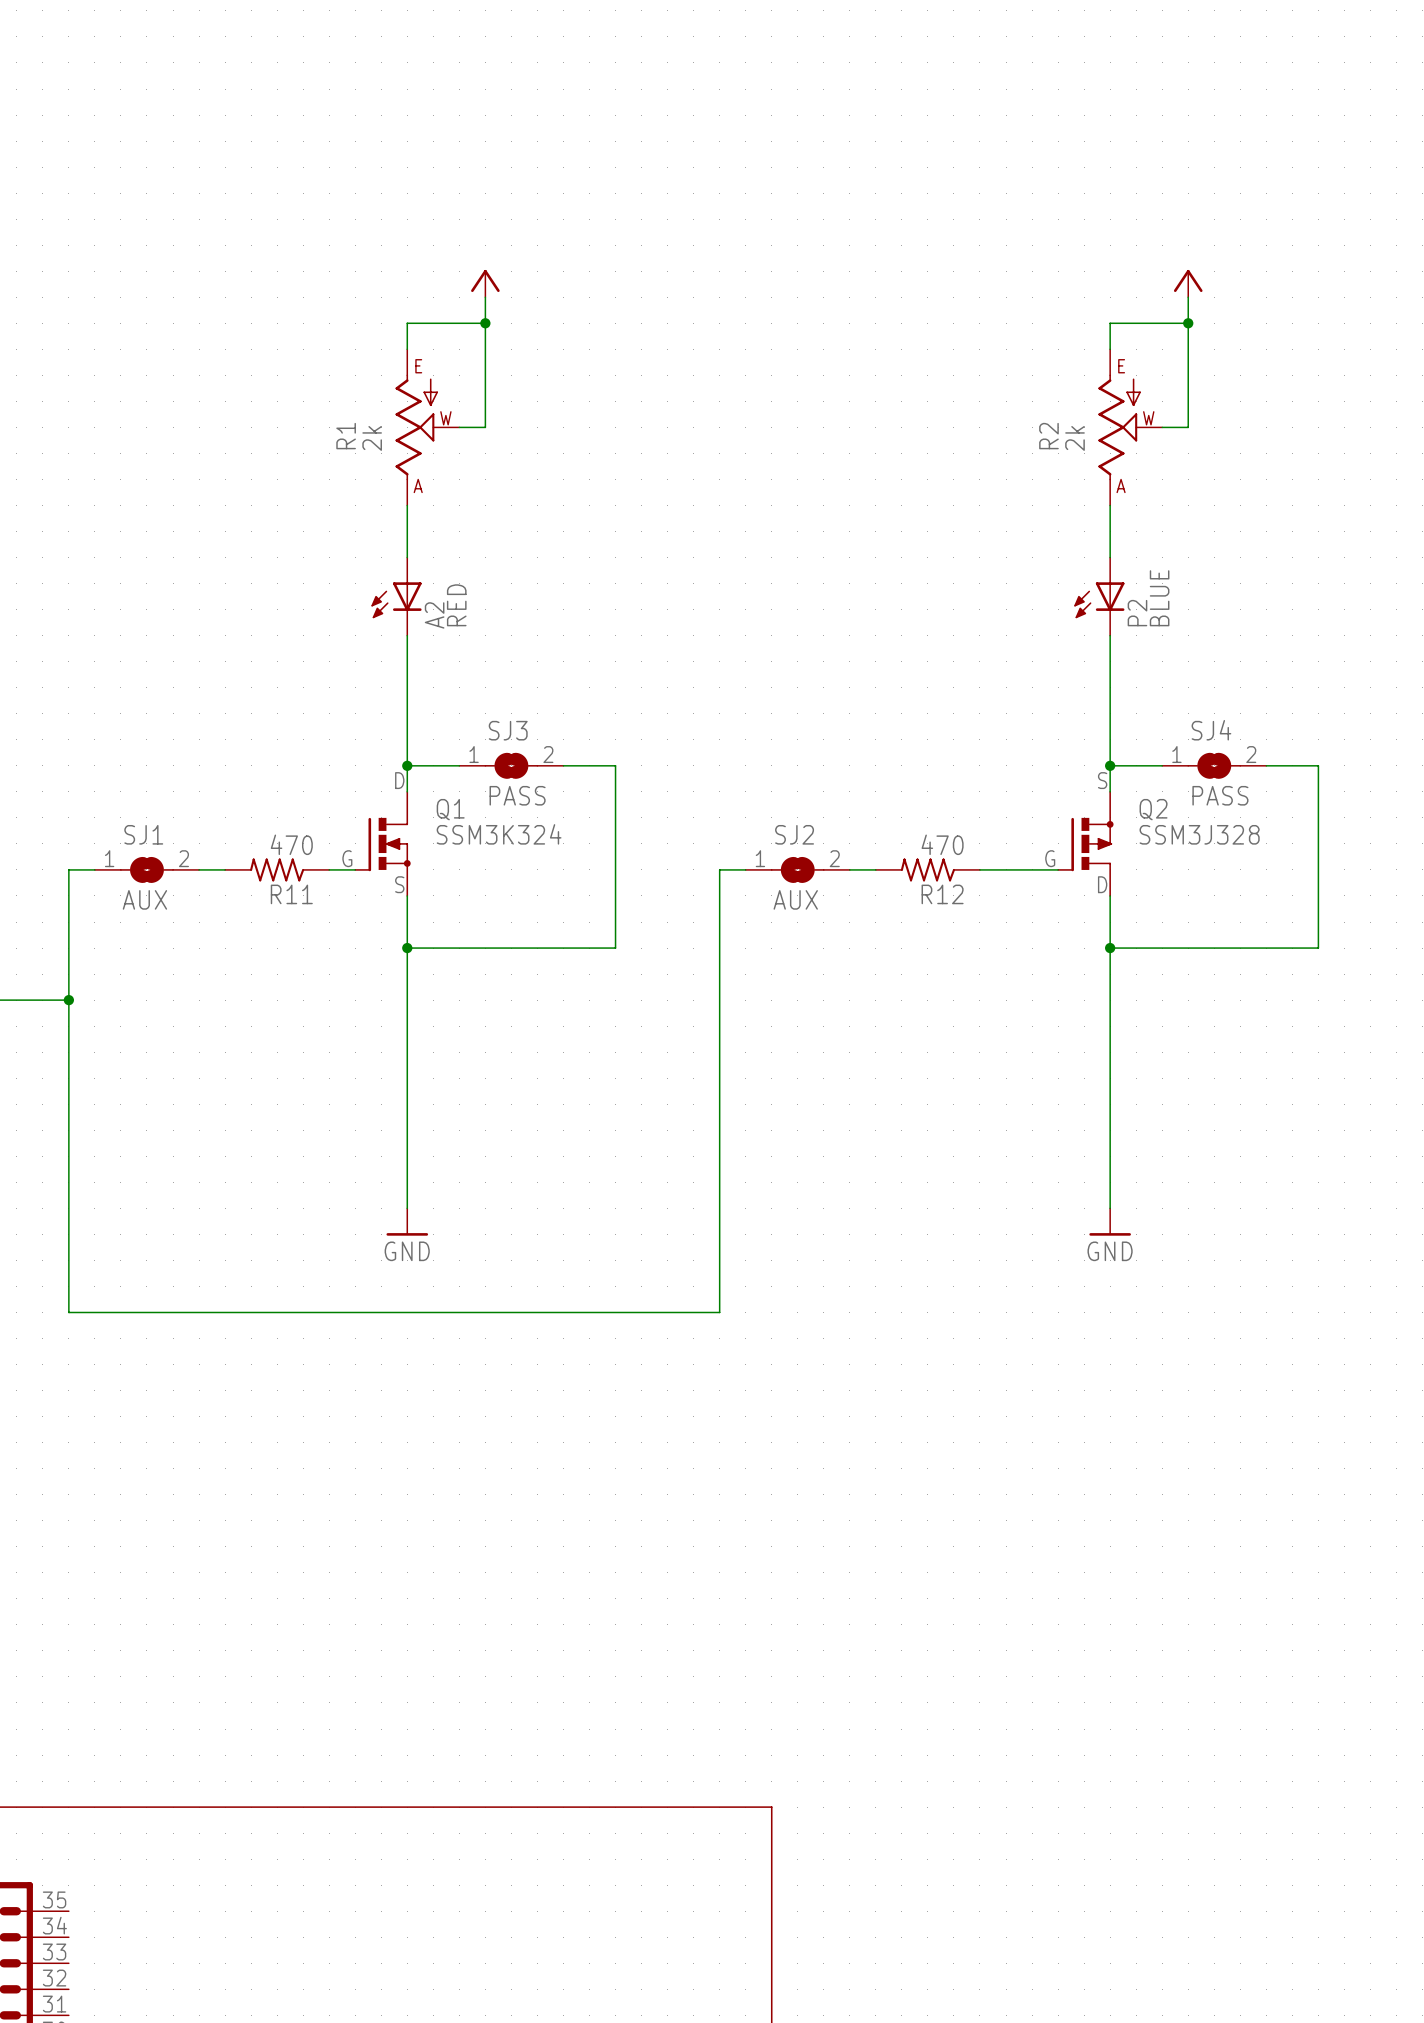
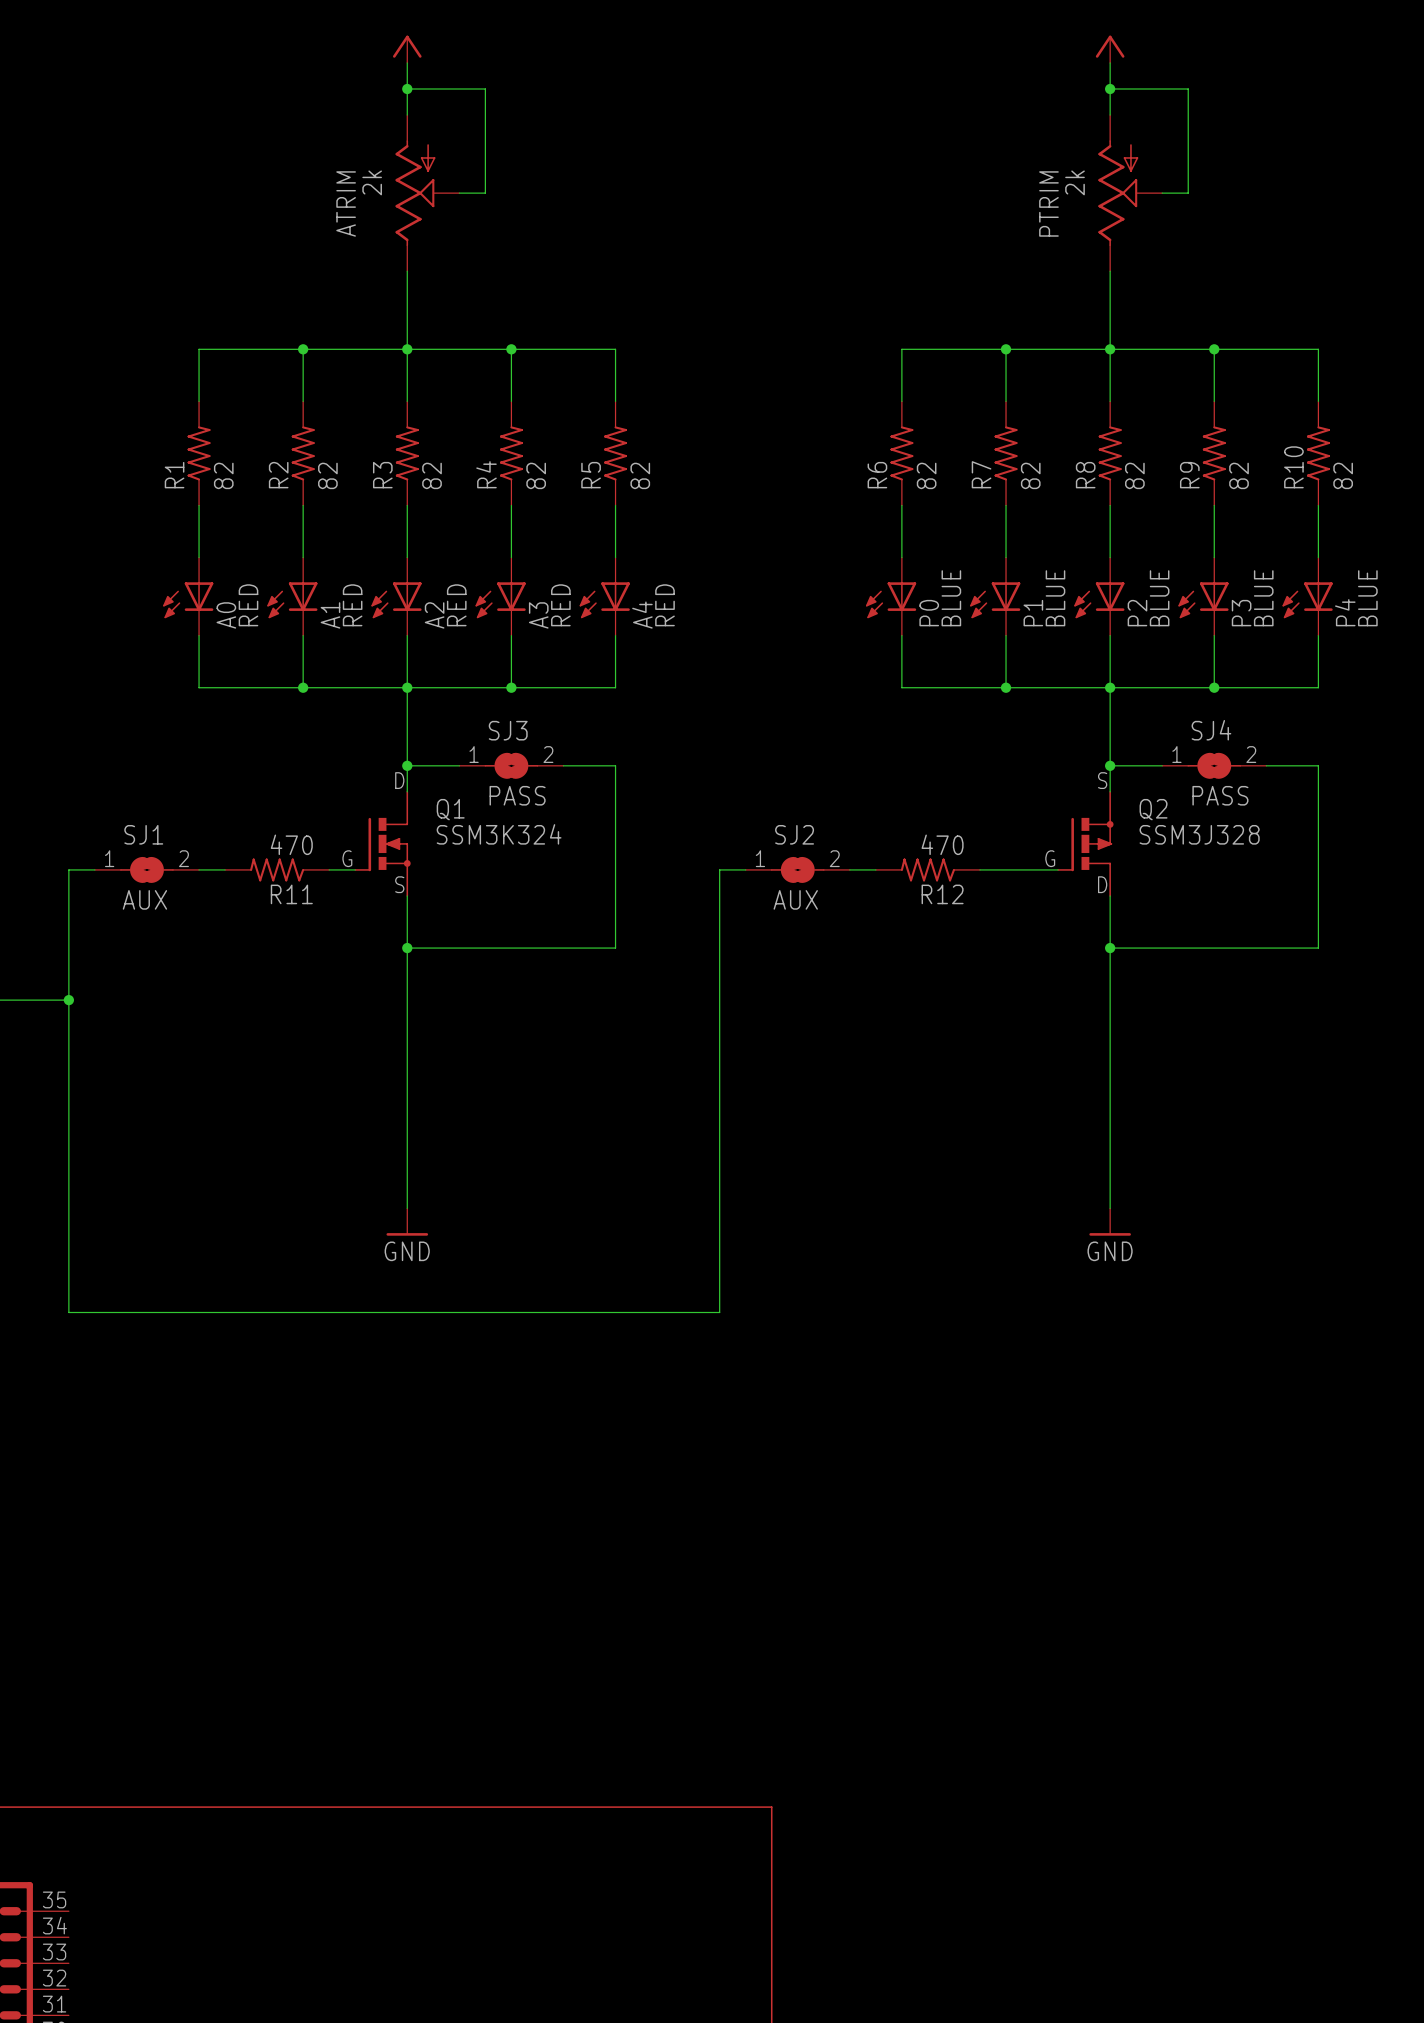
wire: none -> (407, 62) (407, 115)
wire: none -> (1110, 62) (1110, 115)
wire: none -> (407, 89) (485, 89) (485, 193) (459, 193)
junction: none -> (407, 89)
wire: none -> (1110, 89) (1188, 89) (1188, 193) (1162, 193)
junction: none -> (1110, 89)
ATRIM: none -> 2k (427, 193)
PTRIM: none -> 2k (1130, 193)
power symbol position: (485, 283) -> (407, 49)
power symbol position: (1188, 283) -> (1110, 49)
wire: (485, 297) (485, 427) (459, 427) -> none
wire: (1188, 297) (1188, 427) (1162, 427) -> none
wire: (407, 323) (485, 323) -> (407, 323) (407, 271)
junction position: (485, 323) -> (511, 349)
wire: (1110, 323) (1188, 323) -> (1110, 323) (1110, 271)
junction position: (1188, 323) -> (1214, 349)
wire: none -> (303, 349) (303, 401)
junction: none -> (303, 349)
R1 symbol: [395, 349, 460, 506] -> [187, 401, 211, 506]
junction: none -> (407, 349)
wire: none -> (511, 349) (511, 401)
wire: none -> (1006, 349) (1006, 401)
junction: none -> (1006, 349)
R2 symbol: [1098, 349, 1163, 506] -> [291, 401, 315, 506]
junction: none -> (1110, 349)
wire: none -> (1214, 349) (1214, 401)
wire: none -> (199, 401) (199, 349) (615, 349) (615, 401)
wire: none -> (901, 401) (901, 349) (1318, 349) (1318, 401)
R1 name position: R1 (346, 436) -> R1 (174, 475)
R2 name position: R2 (1048, 436) -> R2 (278, 475)
R1 value: 2k (372, 438) -> 82 (223, 475)
R2 value: 2k (1075, 438) -> 82 (327, 475)
R3: none -> 82 (407, 453)
R4: none -> 82 (511, 453)
R5: none -> 82 (615, 453)
R6: none -> 82 (901, 453)
R7: none -> 82 (1006, 453)
R8: none -> 82 (1110, 453)
R9: none -> 82 (1214, 453)
R10: none -> 82 (1318, 453)
wire: none -> (199, 505) (199, 557)
wire: none -> (303, 505) (303, 557)
wire: none -> (511, 505) (511, 557)
wire: none -> (615, 505) (615, 557)
wire: none -> (901, 505) (901, 557)
wire: none -> (1006, 505) (1006, 557)
wire: none -> (1214, 505) (1214, 557)
wire: none -> (1318, 505) (1318, 557)
A0: none -> RED (188, 596)
A1: none -> RED (292, 596)
A3: none -> RED (500, 596)
A4: none -> RED (604, 596)
P0: none -> BLUE (891, 596)
P1: none -> BLUE (995, 596)
P3: none -> BLUE (1203, 596)
P4: none -> BLUE (1307, 596)
wire: none -> (199, 635) (199, 687) (615, 687) (615, 635)
wire: none -> (303, 635) (303, 687)
wire: none -> (511, 635) (511, 687)
wire: none -> (901, 635) (901, 687) (1318, 687) (1318, 635)
wire: none -> (1006, 635) (1006, 687)
wire: none -> (1214, 635) (1214, 687)
junction: none -> (303, 687)
junction: none -> (407, 687)
junction: none -> (511, 687)
junction: none -> (1006, 687)
junction: none -> (1110, 687)
junction: none -> (1214, 687)

